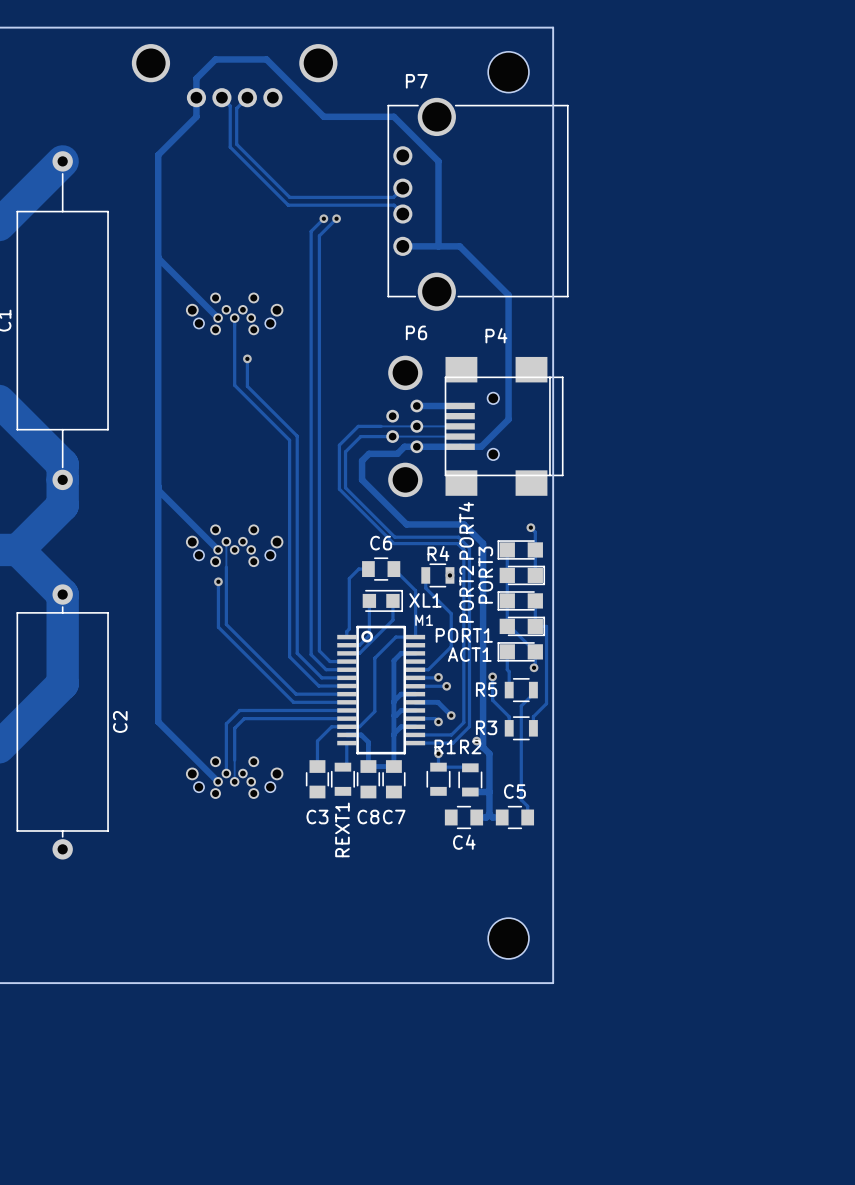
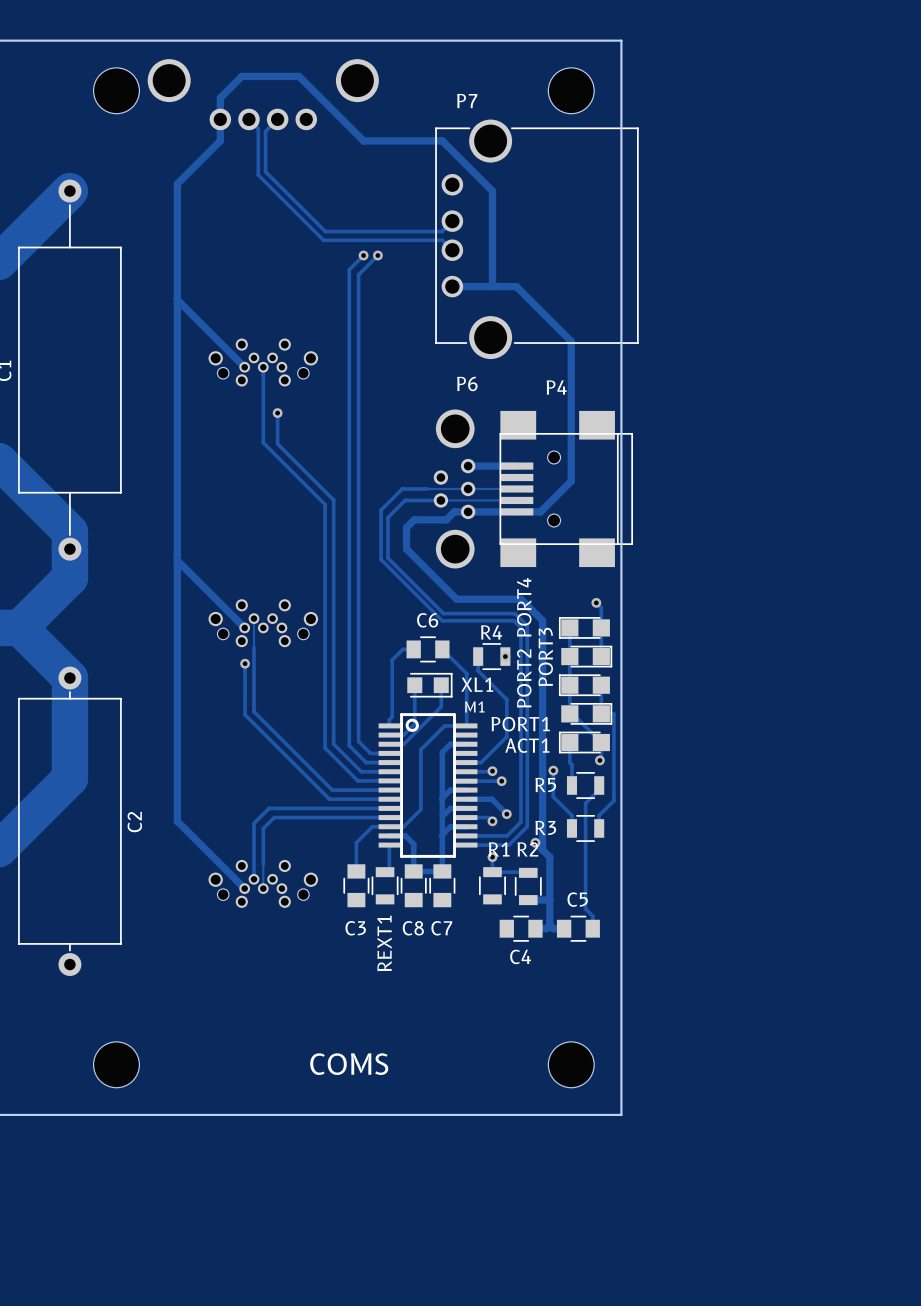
part: none -> (116, 90)
text: none -> COMS (349, 1064)
part: none -> (116, 1064)

